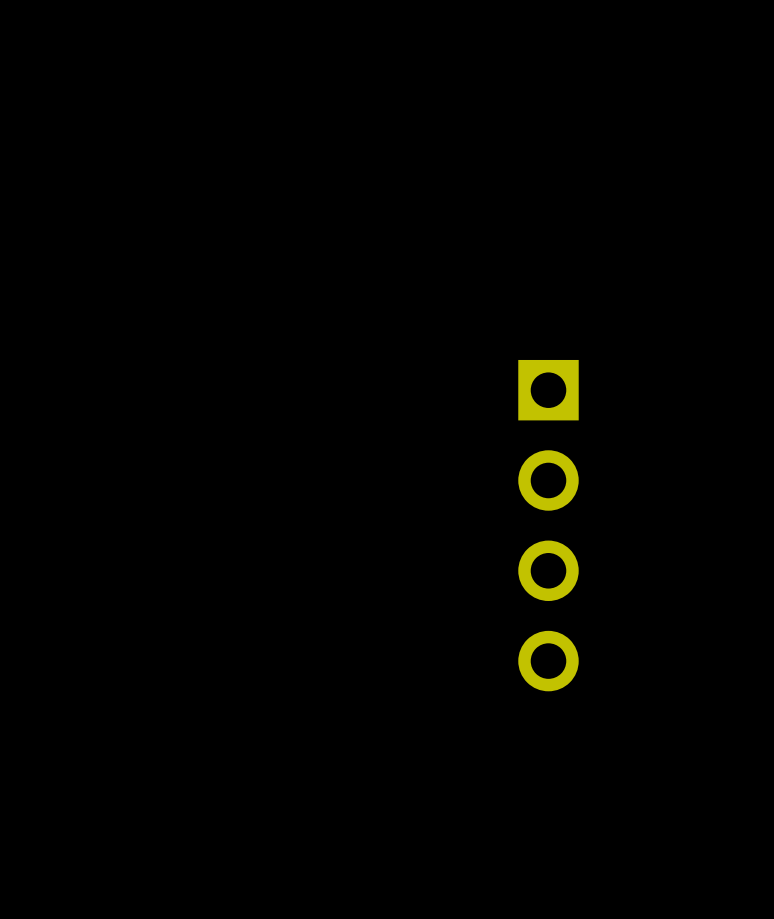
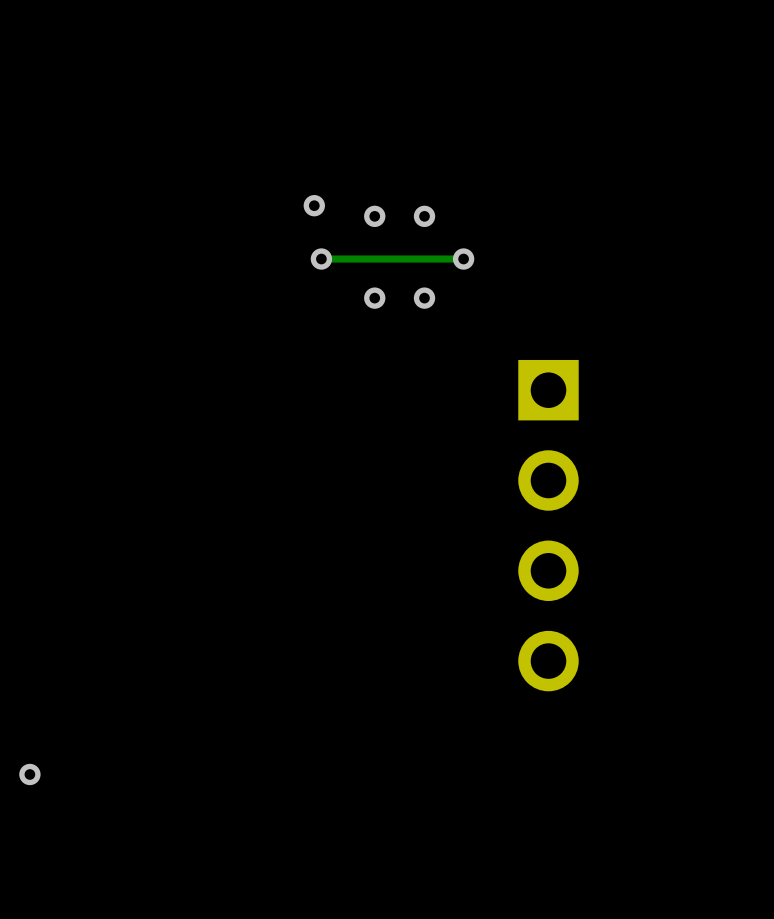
via: none -> (314, 205)
via: none -> (374, 216)
via: none -> (424, 216)
via: none -> (321, 259)
track: none -> (463, 259) (321, 259)
via: none -> (463, 259)
via: none -> (374, 298)
via: none -> (424, 298)
via: none -> (29, 774)

